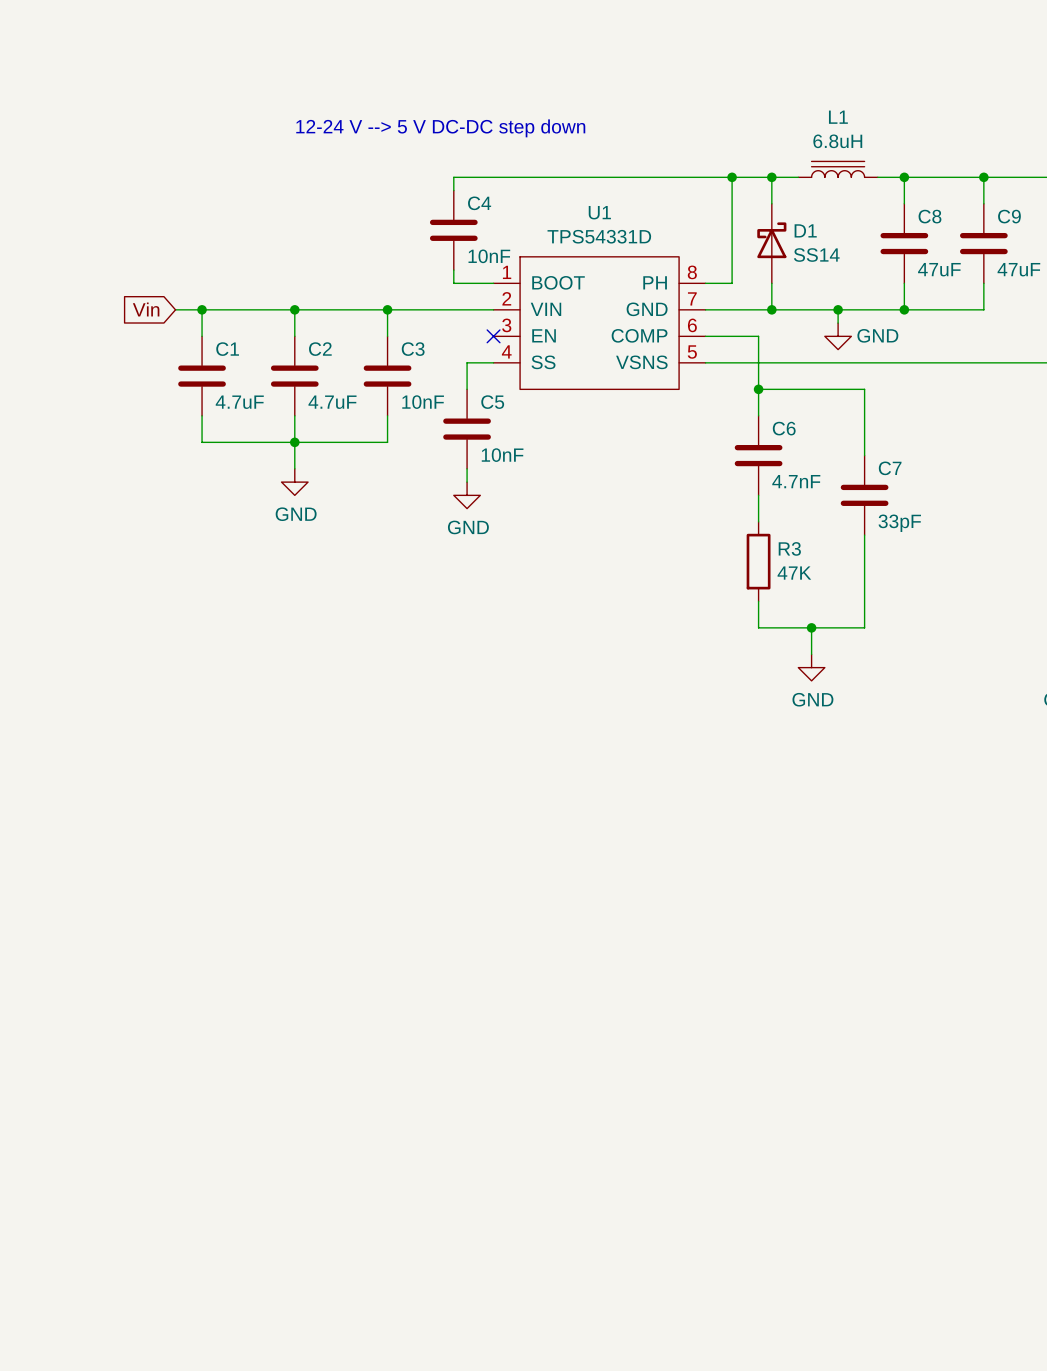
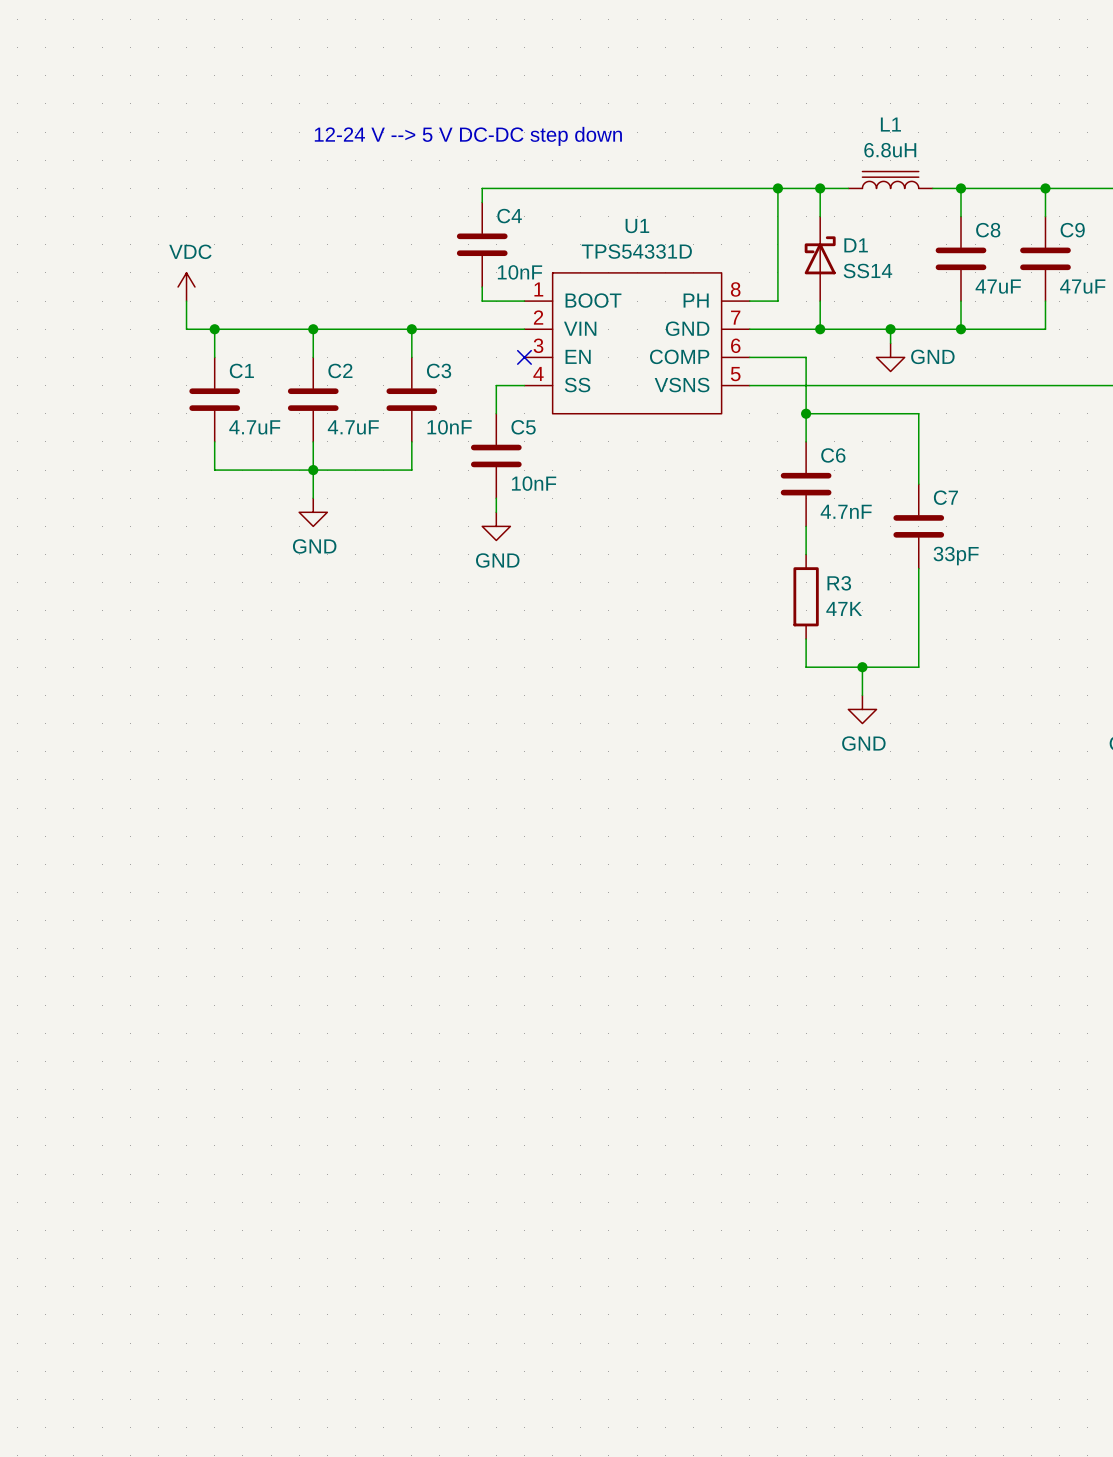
power symbol: none -> VDC (186, 287)
wire: none -> (186, 301) (186, 329)
global label: Vin (146, 309) -> none

